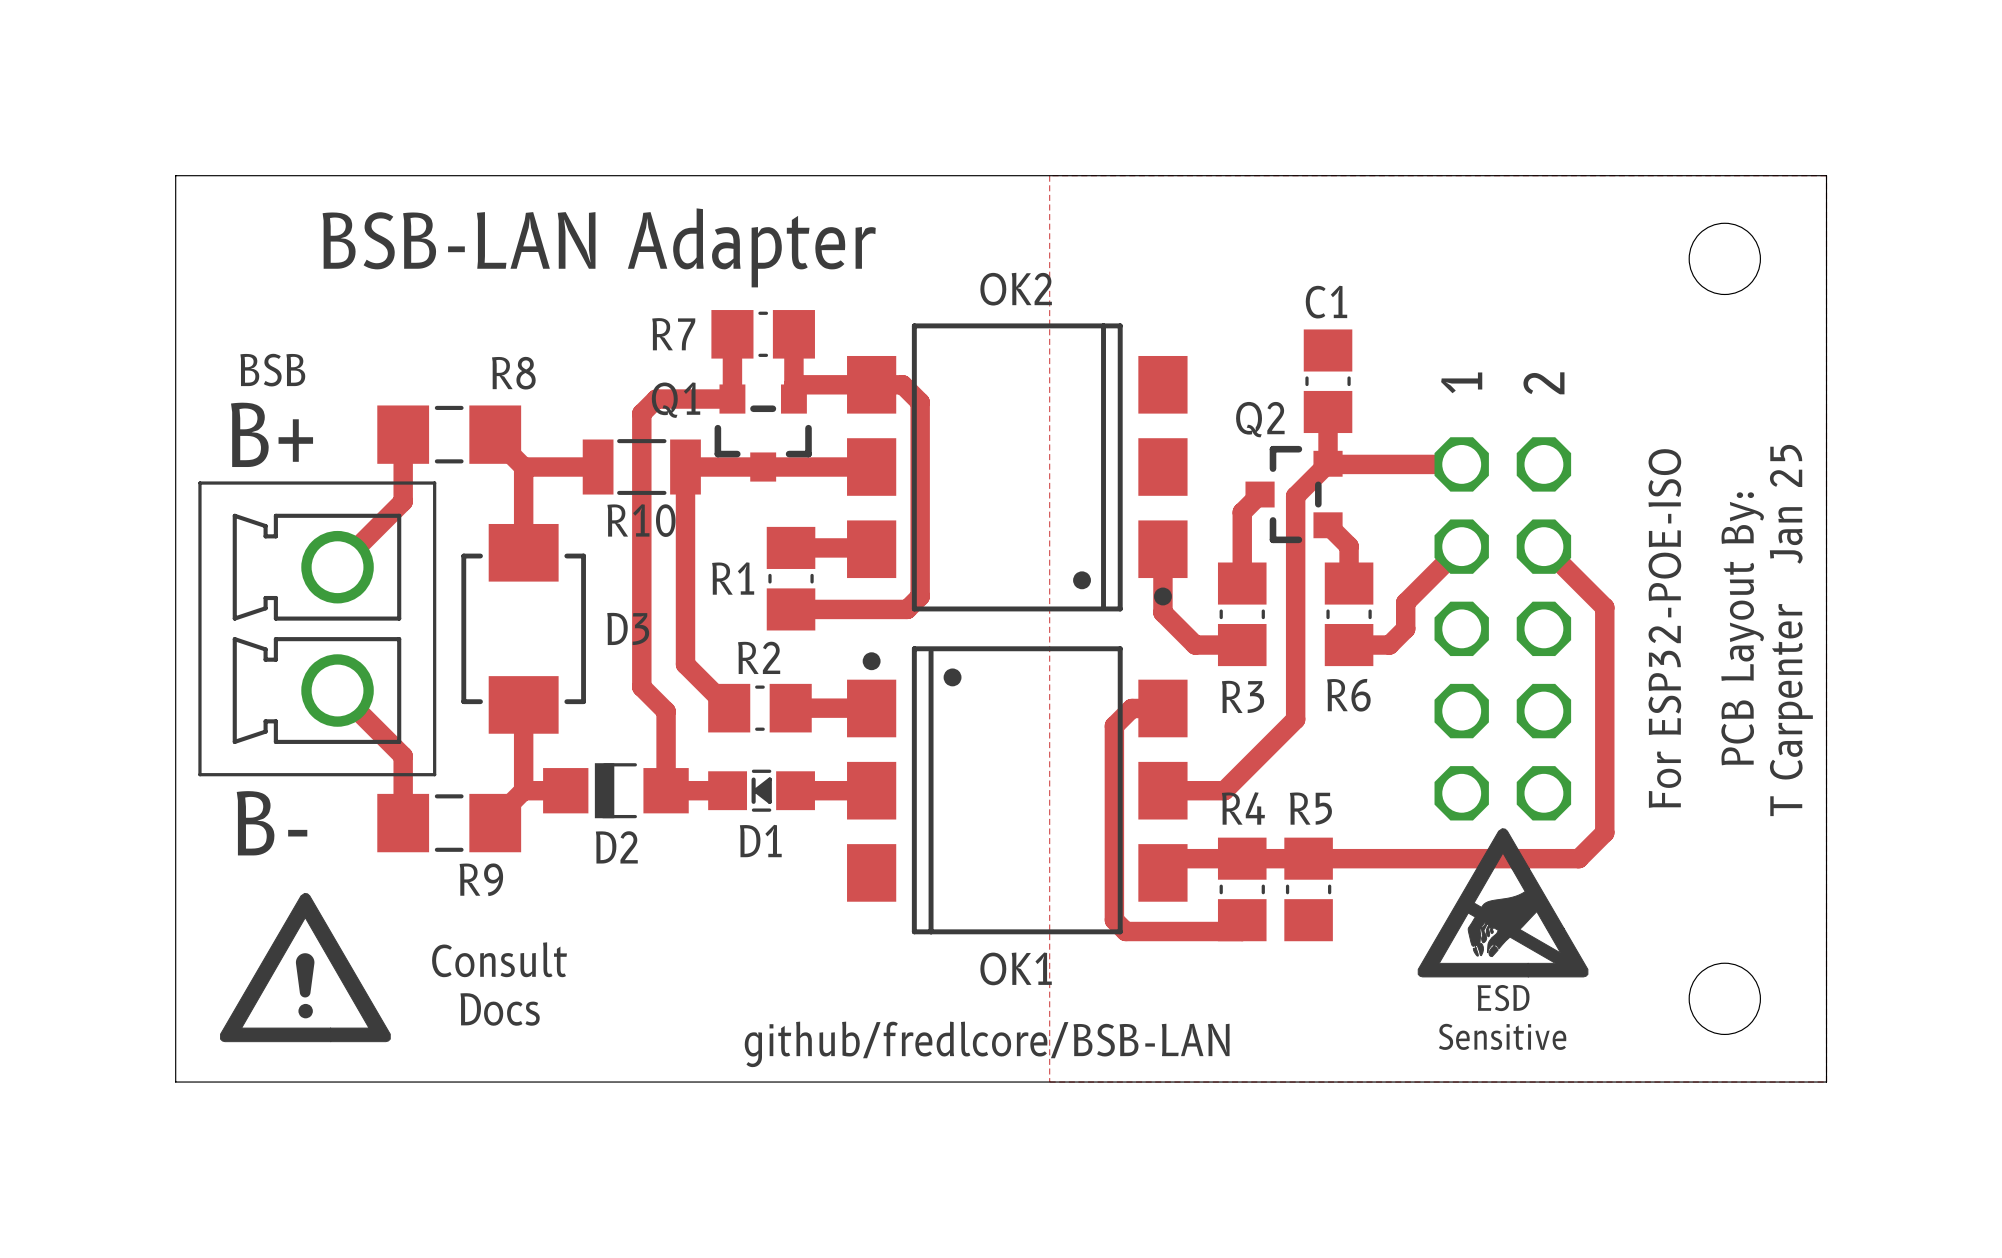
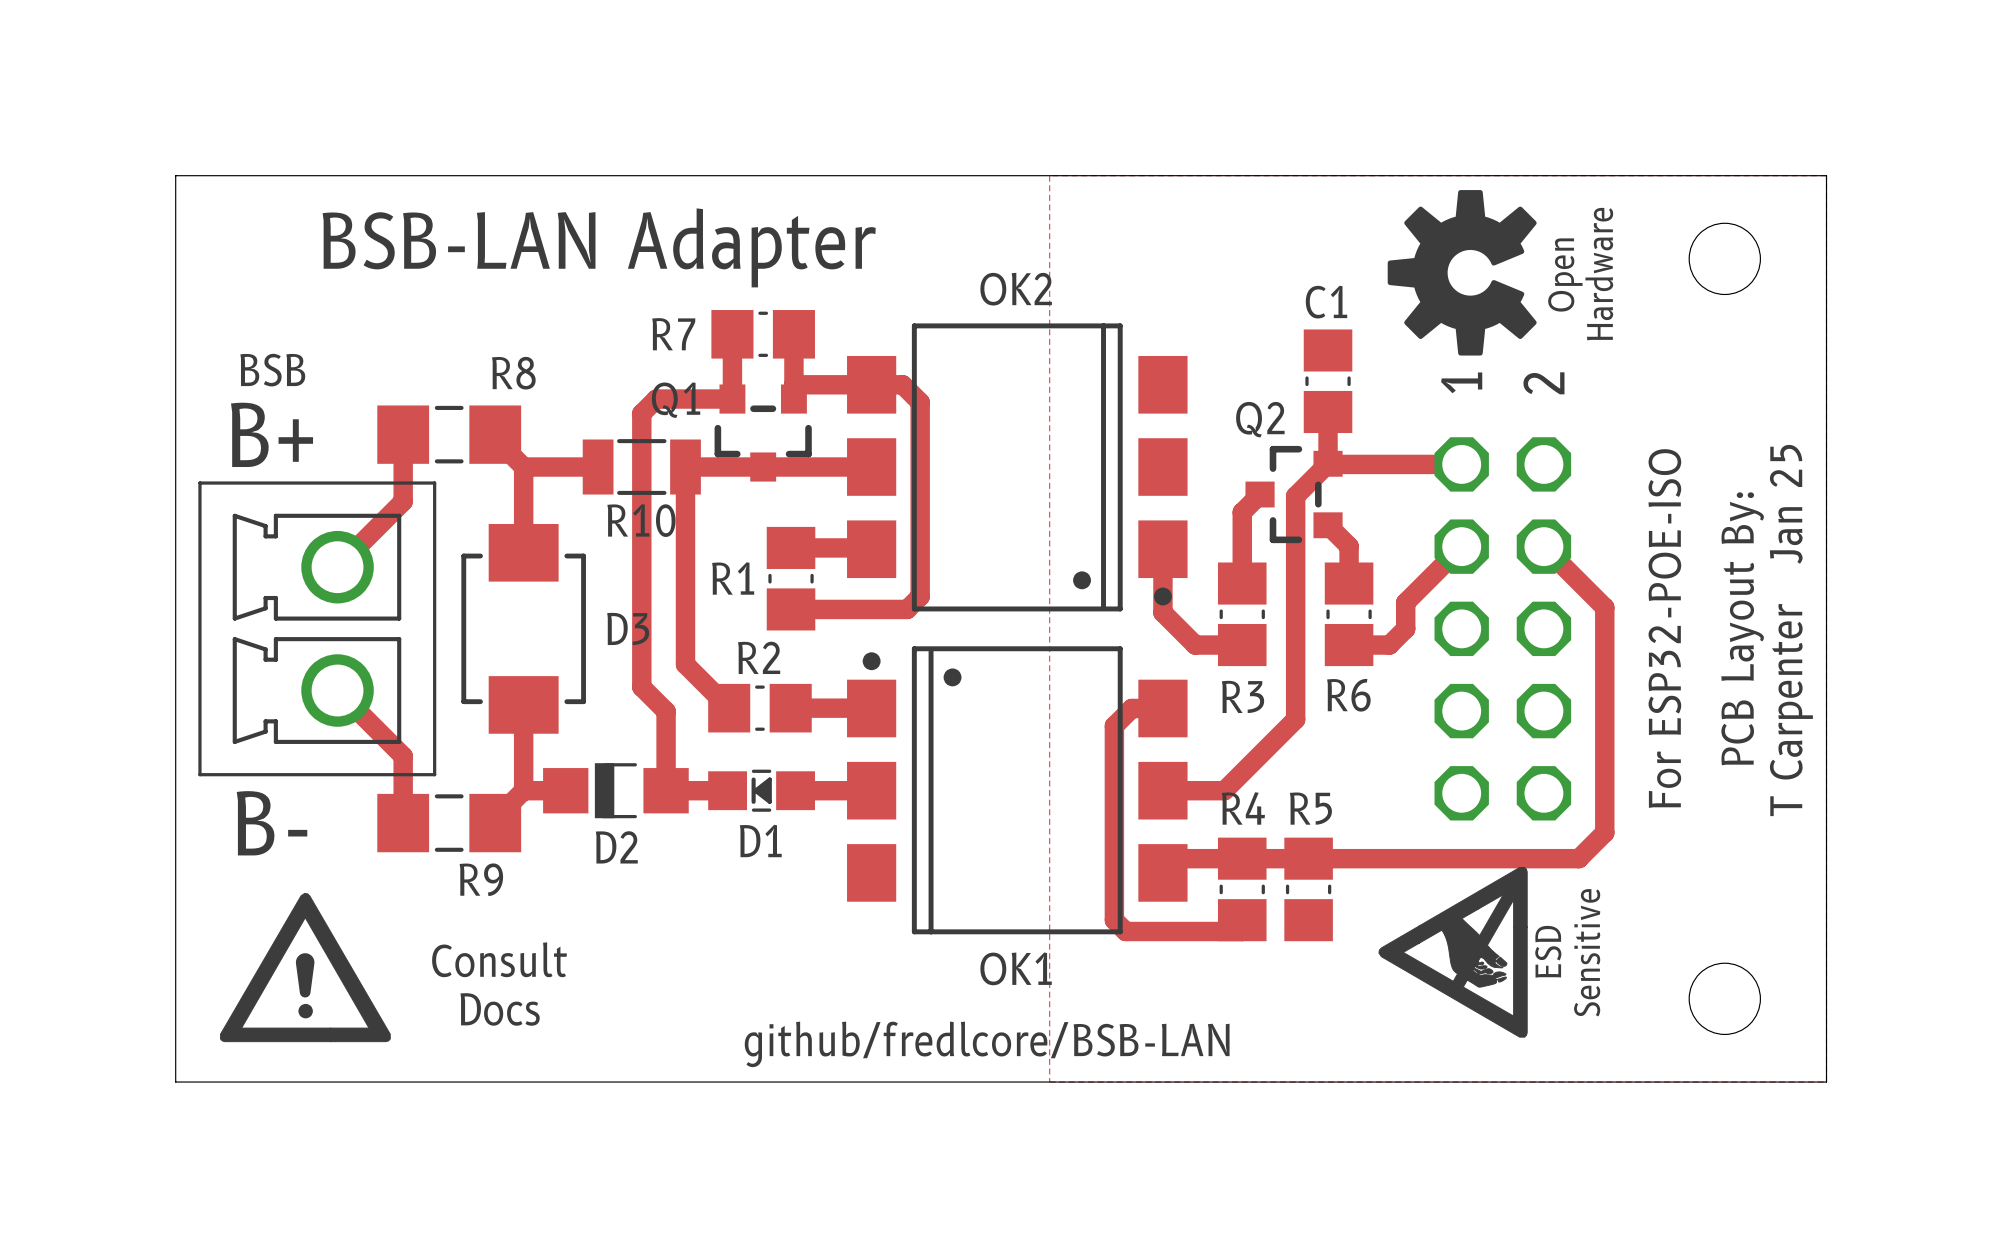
drawing: none -> [1387, 190, 1537, 356]
text: none -> Hardware (1599, 274)
text: none -> Open (1565, 275)
drawing: [1417, 828, 1589, 978] -> none
drawing: none -> [1378, 866, 1528, 1038]

